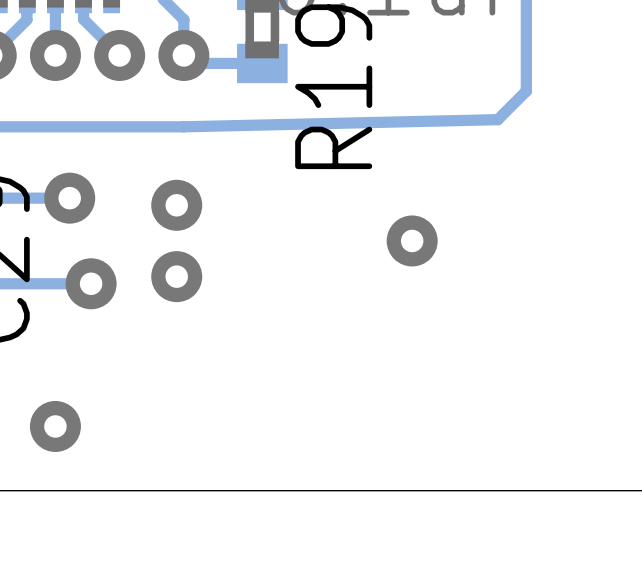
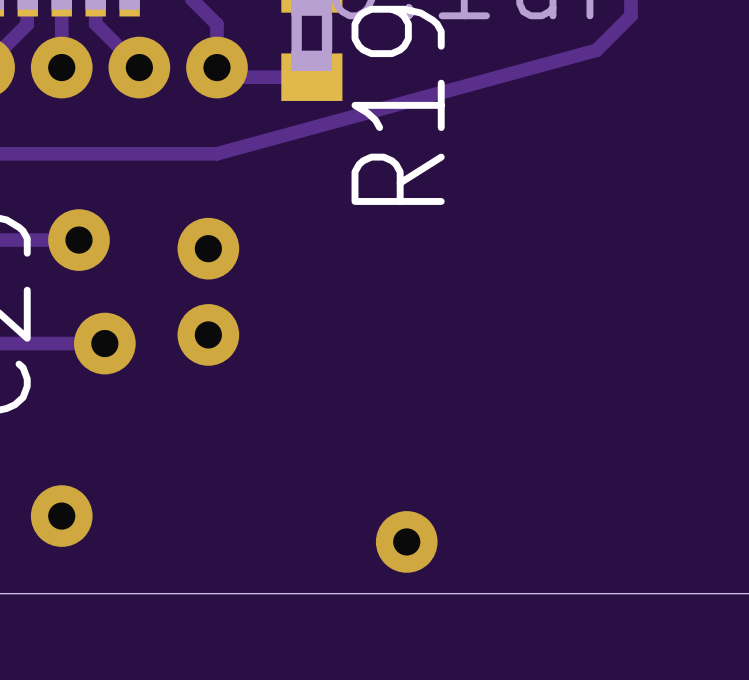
track: (526, 12) (526, 91) (497, 119) (183, 126) -> (630, 15) (596, 50) (216, 153)
via position: (412, 240) -> (406, 541)

